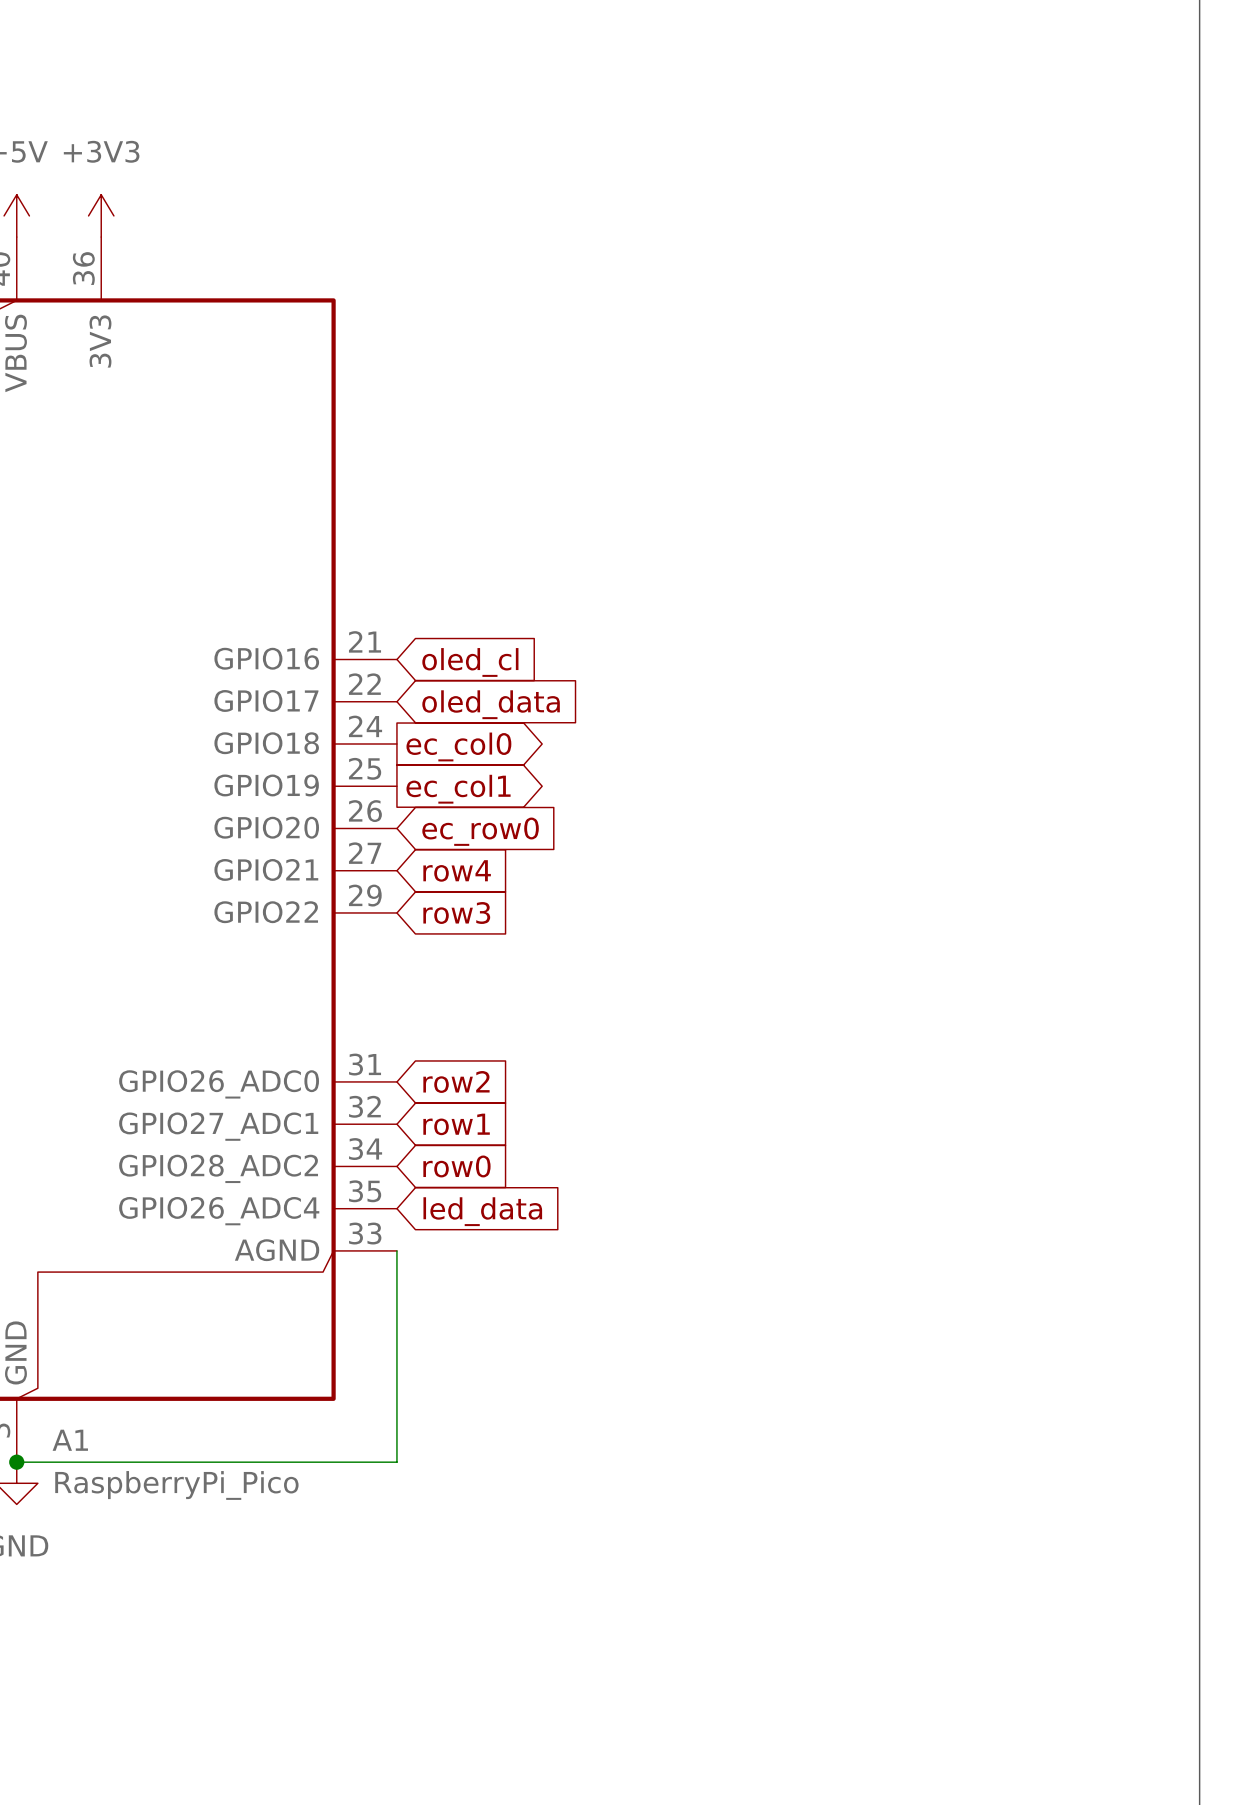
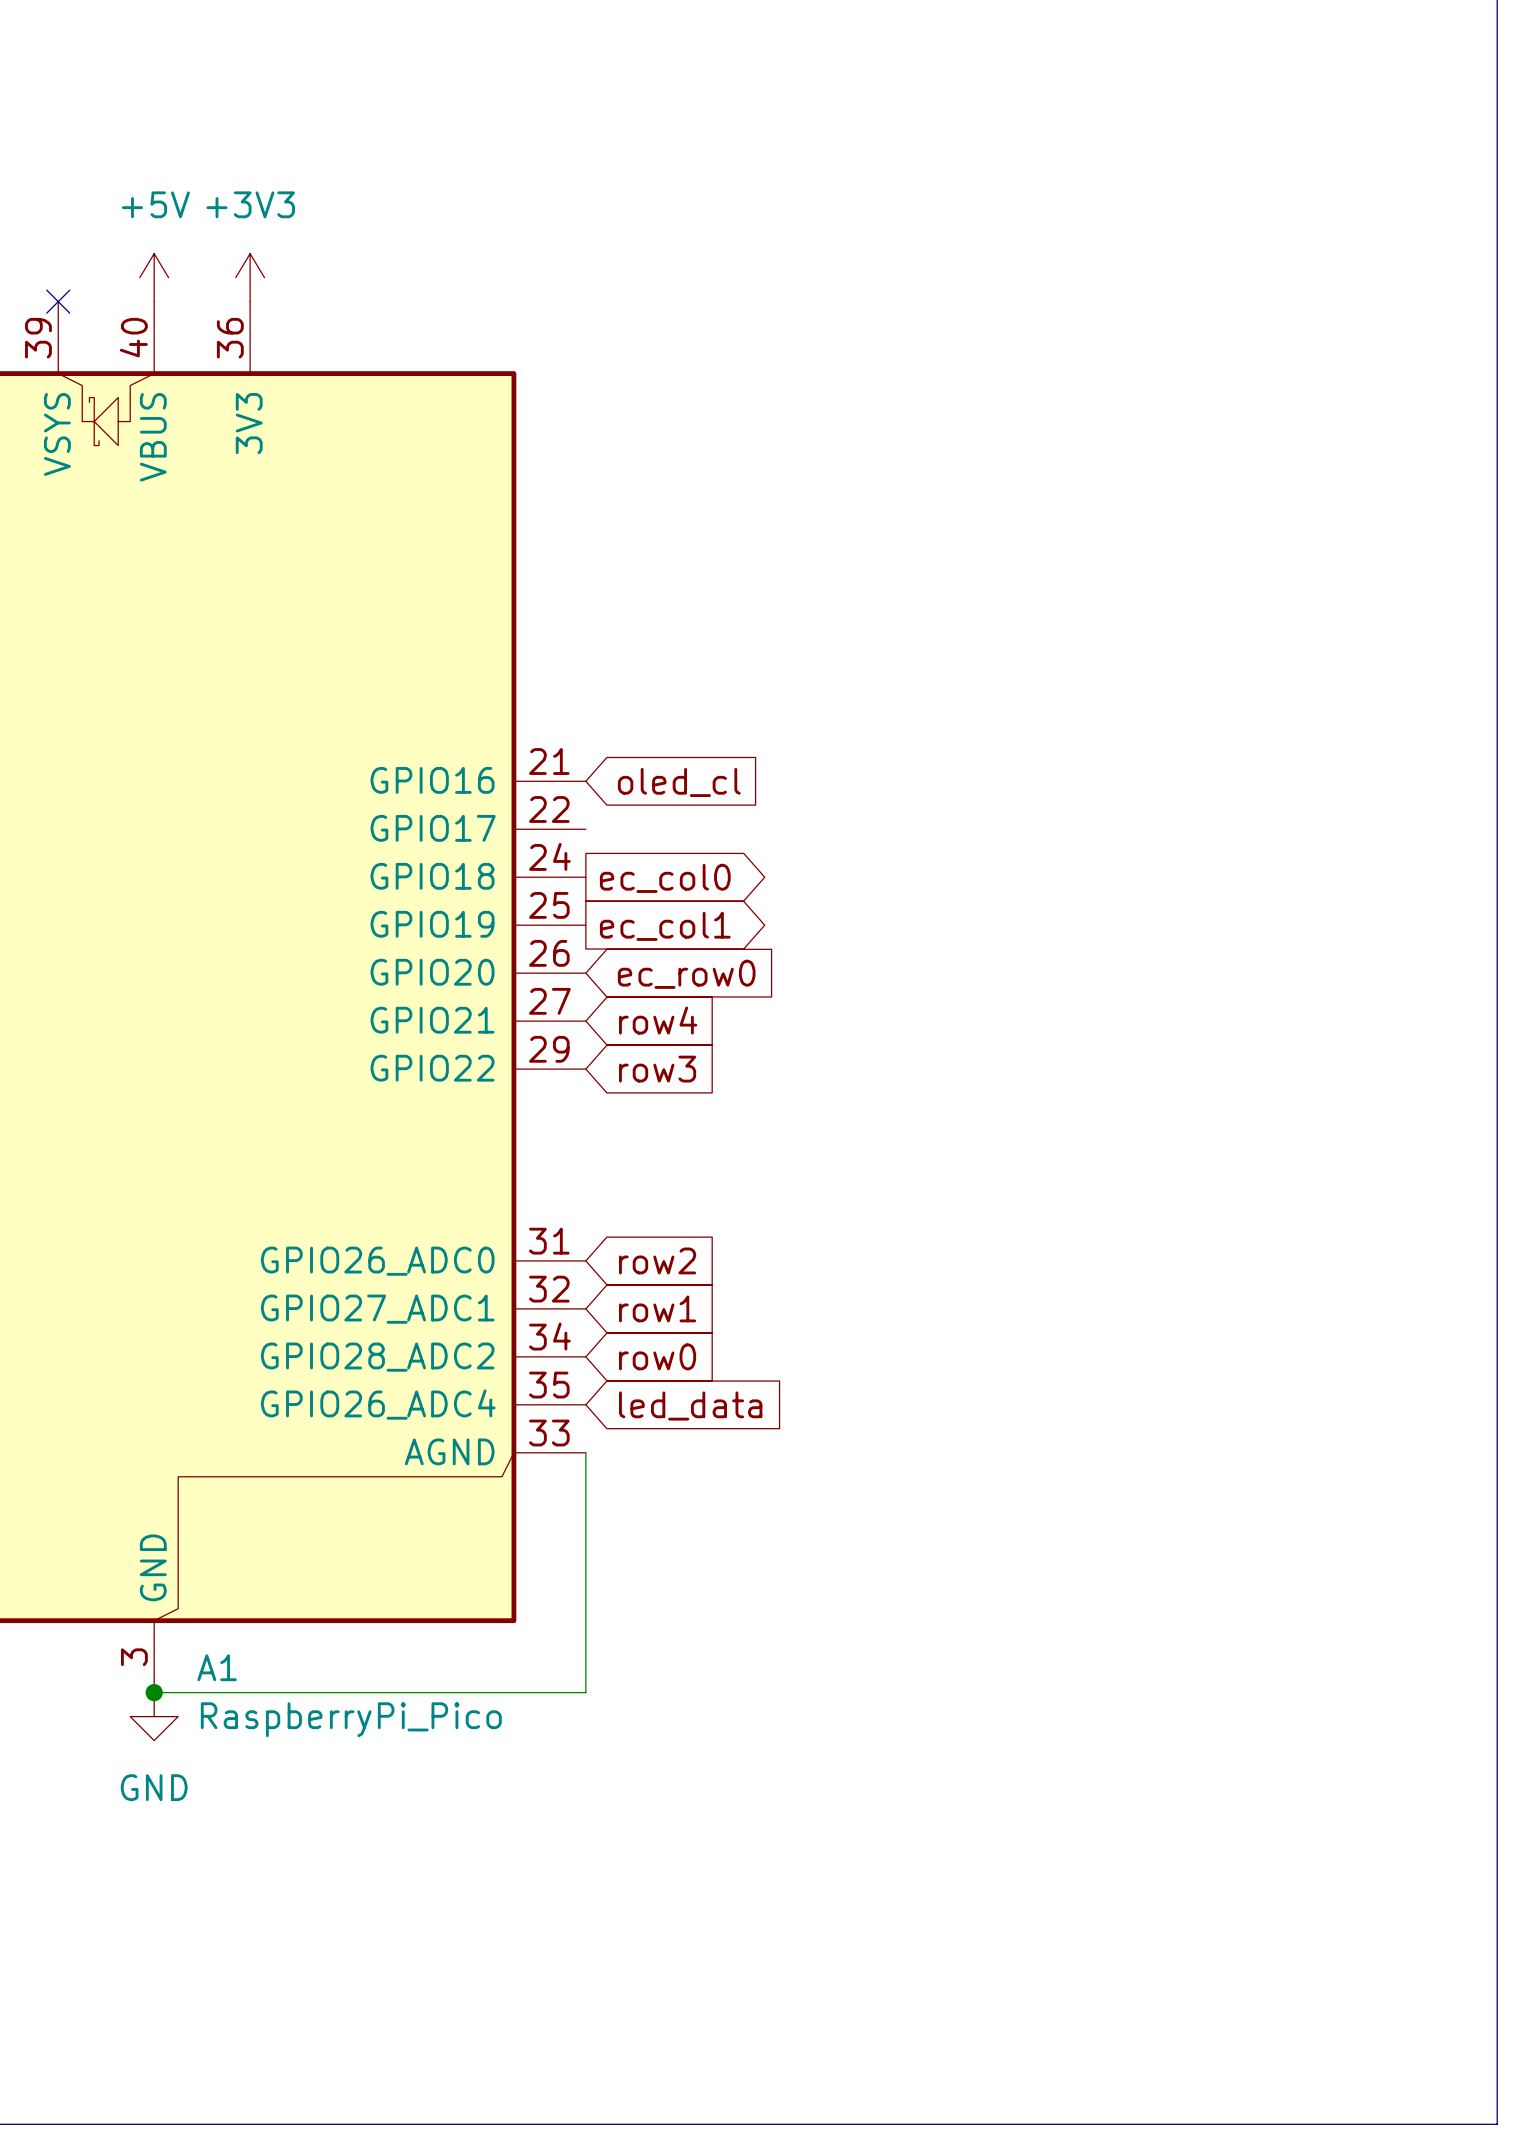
global label: oled_data (491, 704) -> none

